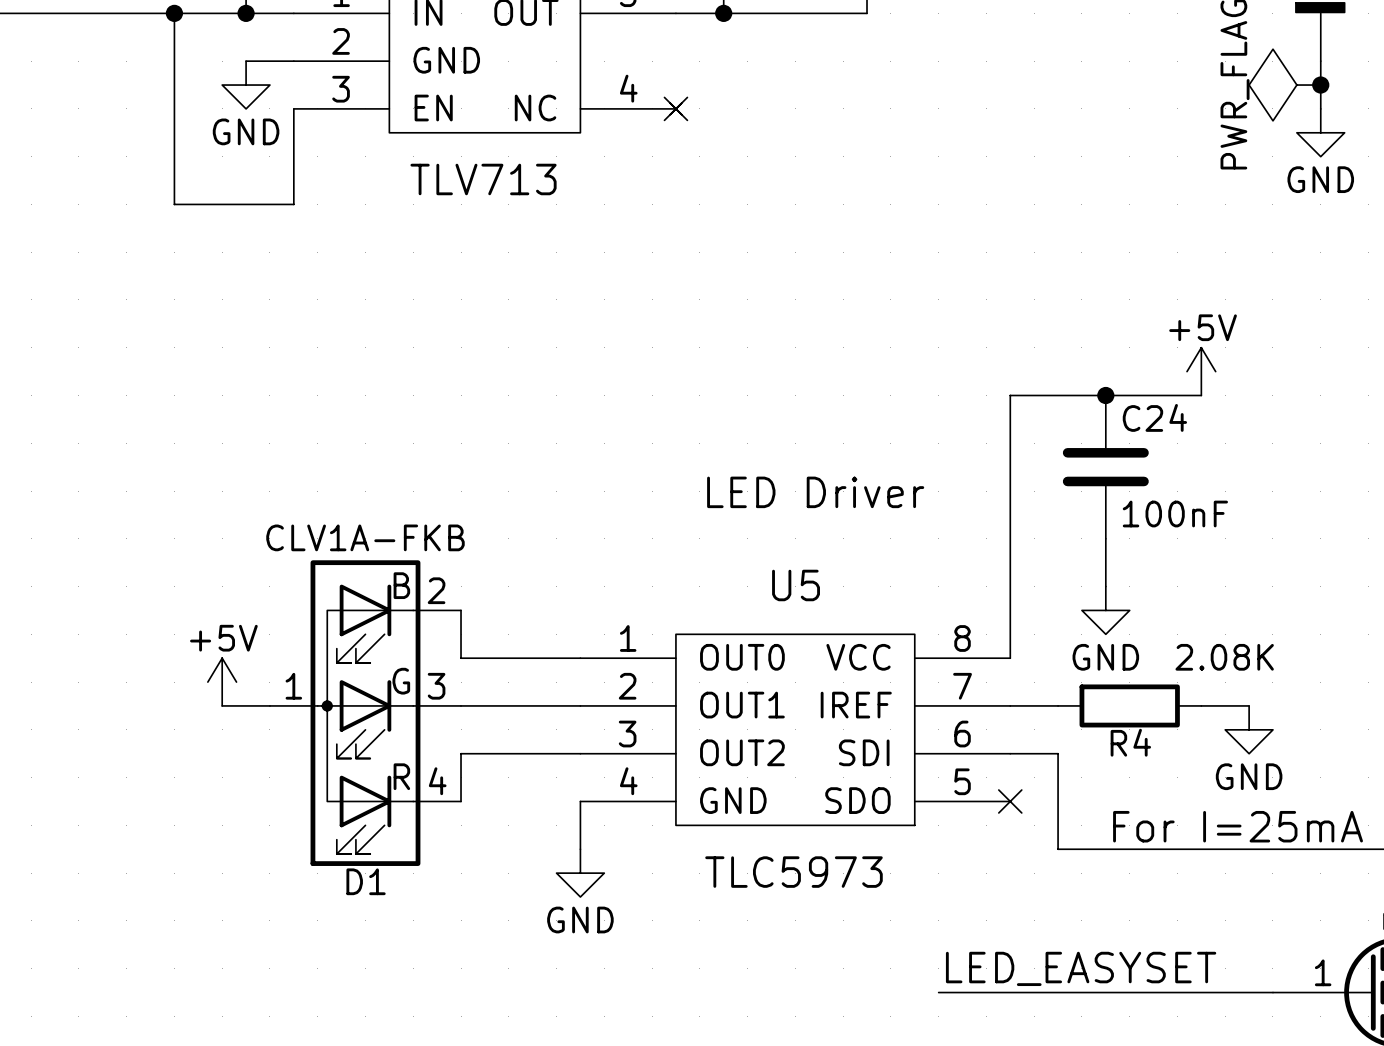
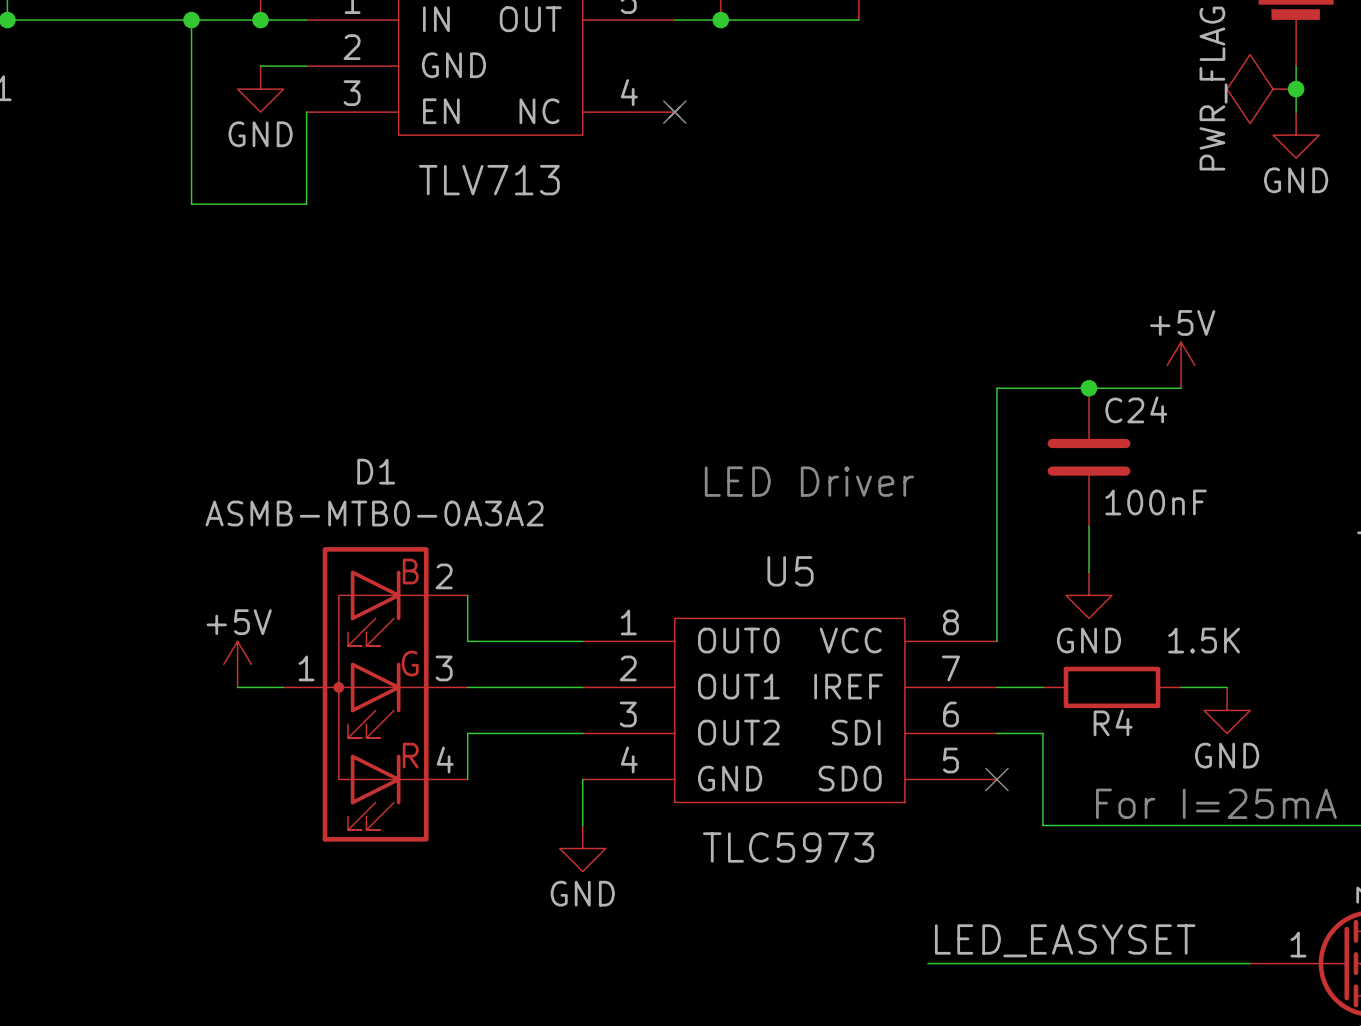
D1 value: CLV1A-FKB (365, 537) -> ASMB-MTB0-0A3A2 (374, 513)
R4 value: 2.08K (1224, 657) -> 1.5K (1204, 640)
D1 name position: D1 (366, 881) -> D1 (376, 471)

